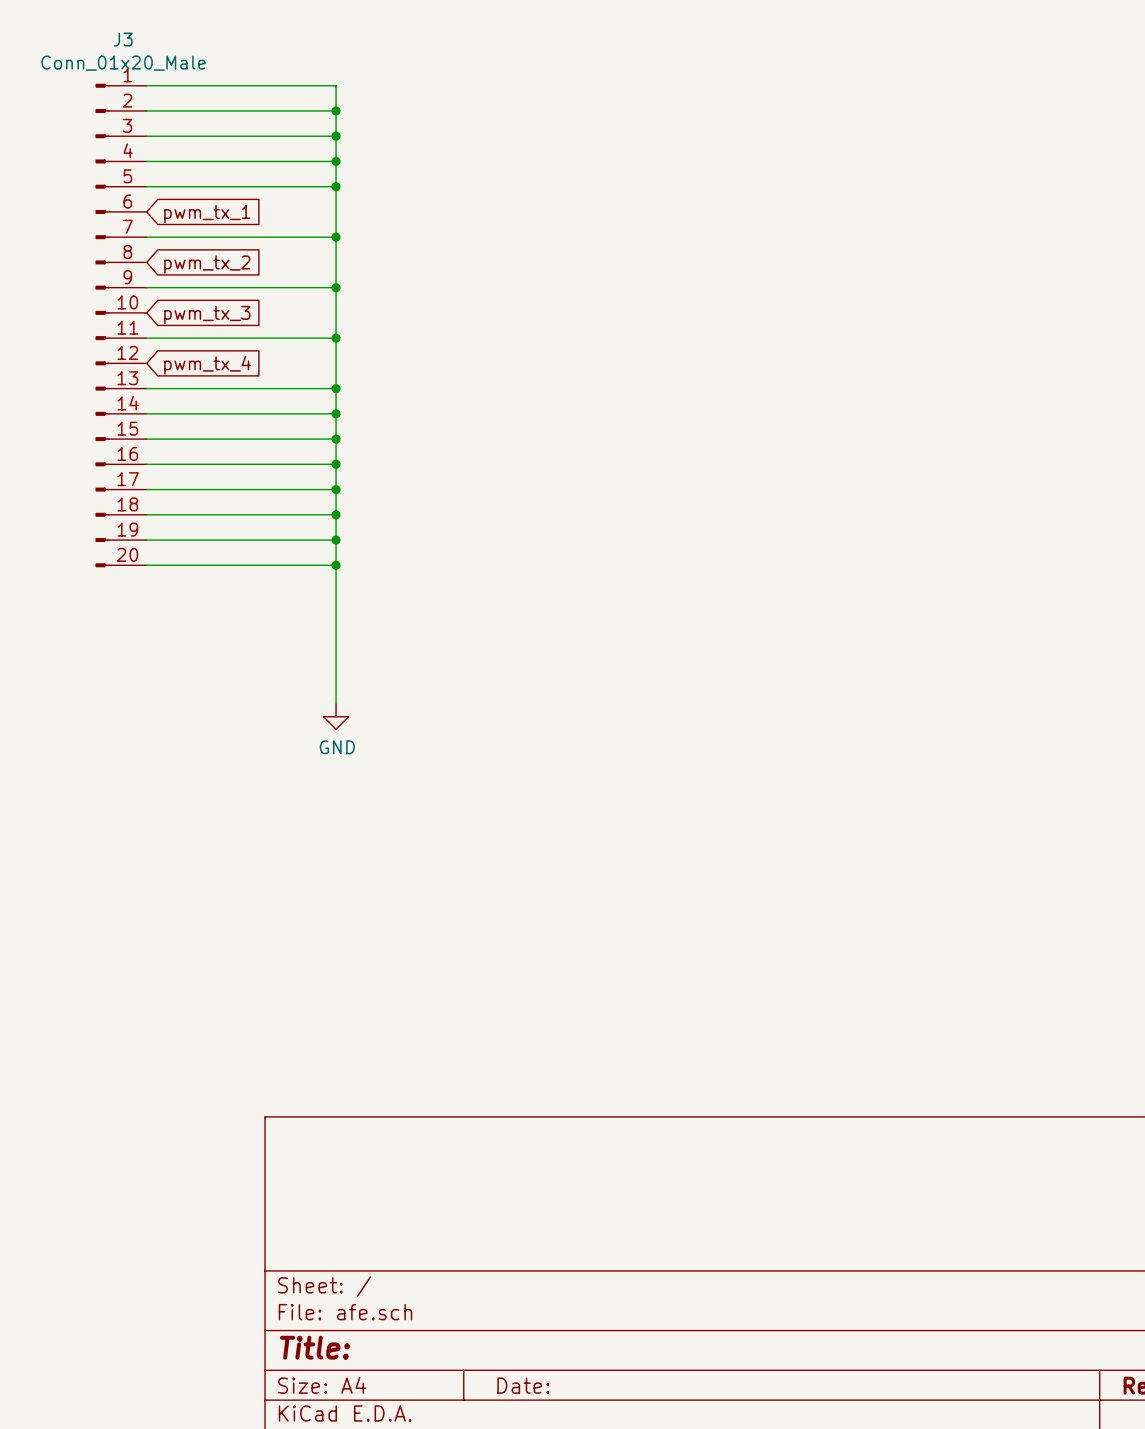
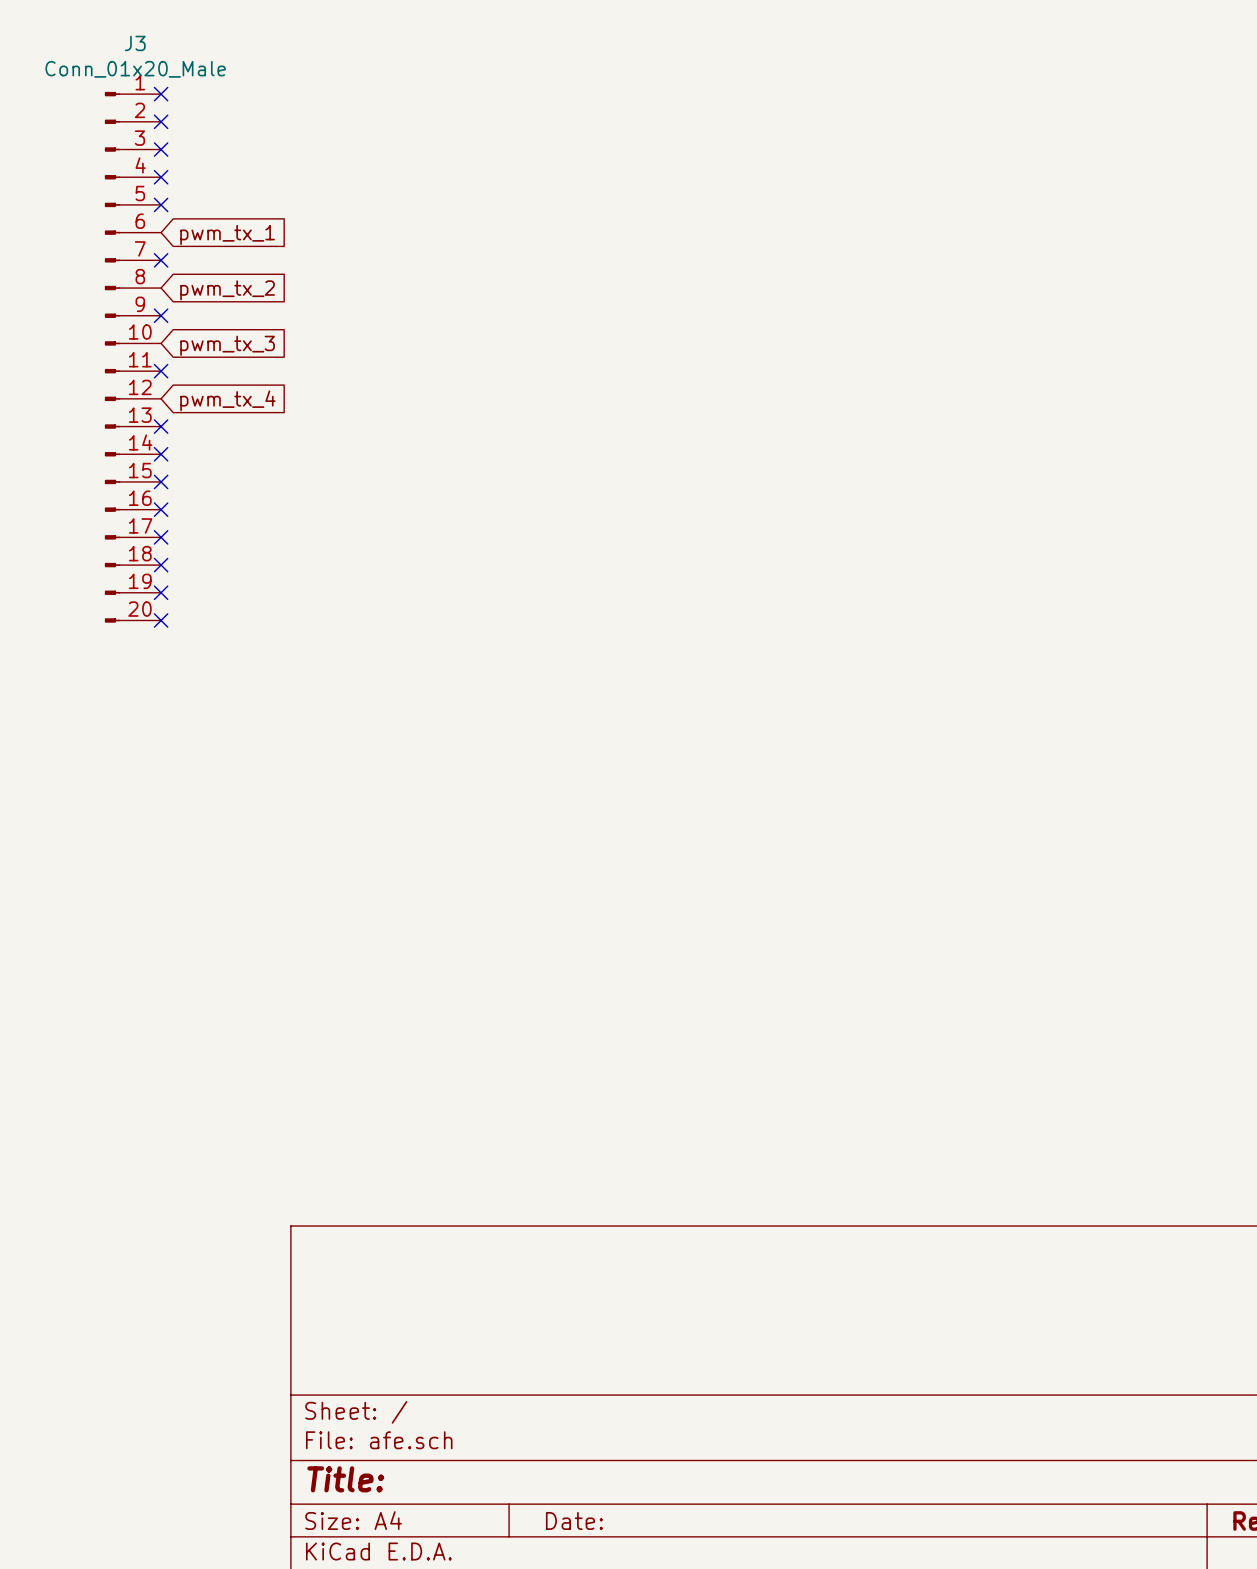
wire: (146, 85) (336, 85) (336, 704) -> none
no-connect mark: none -> (161, 94)
wire: (146, 110) (336, 110) -> none
no-connect mark: none -> (161, 121)
junction: (336, 110) -> none
wire: (146, 136) (336, 136) -> none
no-connect mark: none -> (161, 149)
junction: (336, 136) -> none
wire: (146, 161) (336, 161) -> none
no-connect mark: none -> (161, 177)
junction: (336, 161) -> none
wire: (146, 186) (336, 186) -> none
no-connect mark: none -> (161, 204)
junction: (336, 186) -> none
wire: (146, 237) (336, 237) -> none
no-connect mark: none -> (161, 260)
junction: (336, 237) -> none
wire: (146, 287) (336, 287) -> none
no-connect mark: none -> (161, 315)
junction: (336, 287) -> none
wire: (146, 338) (336, 338) -> none
no-connect mark: none -> (161, 371)
junction: (336, 338) -> none
wire: (146, 388) (336, 388) -> none
no-connect mark: none -> (161, 426)
junction: (336, 388) -> none
wire: (146, 413) (336, 413) -> none
no-connect mark: none -> (161, 454)
junction: (336, 413) -> none
wire: (146, 439) (336, 439) -> none
no-connect mark: none -> (161, 481)
junction: (336, 439) -> none
wire: (146, 464) (336, 464) -> none
no-connect mark: none -> (161, 509)
junction: (336, 464) -> none
wire: (146, 489) (336, 489) -> none
no-connect mark: none -> (161, 537)
junction: (336, 489) -> none
wire: (146, 514) (336, 514) -> none
no-connect mark: none -> (161, 565)
junction: (336, 514) -> none
wire: (146, 540) (336, 540) -> none
no-connect mark: none -> (161, 592)
junction: (336, 540) -> none
wire: (146, 565) (336, 565) -> none
no-connect mark: none -> (161, 620)
junction: (336, 565) -> none
power symbol: GND (336, 716) -> none

